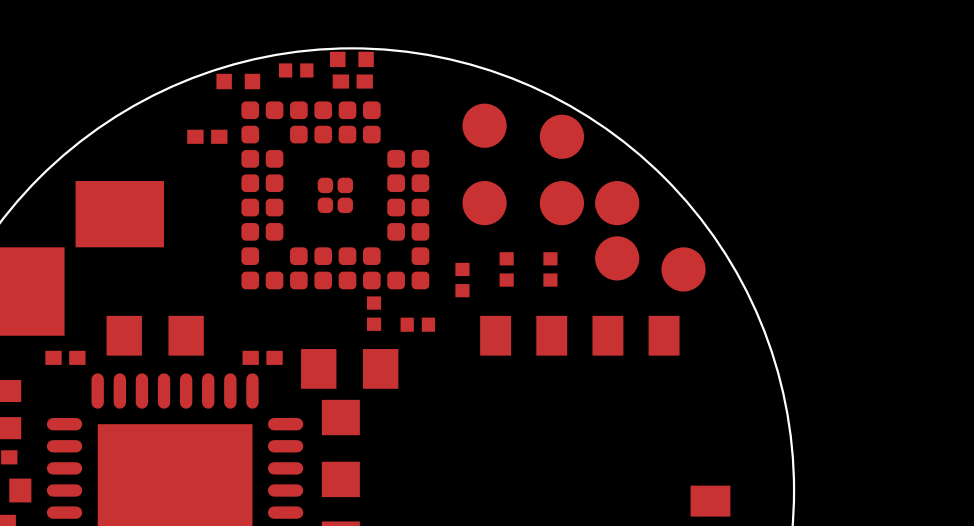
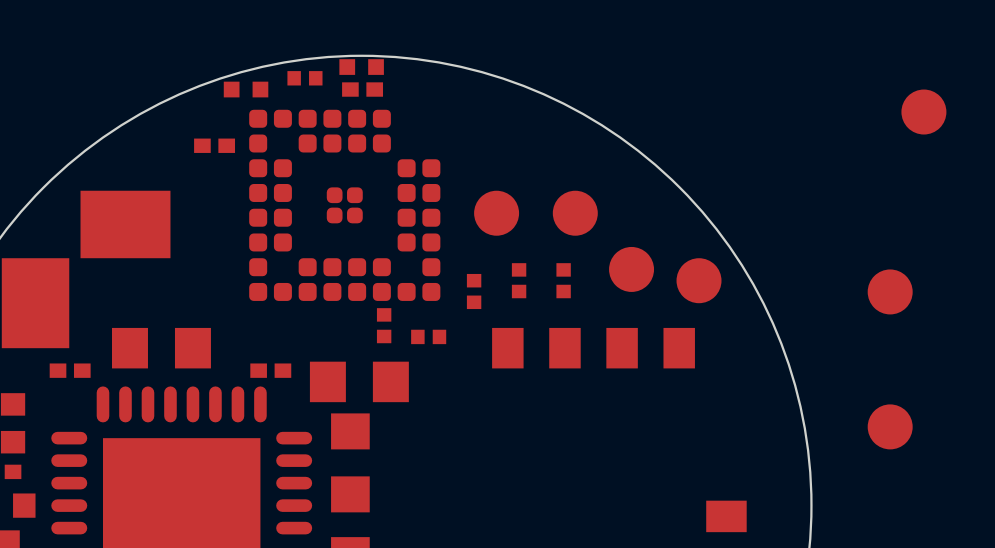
part: none -> (923, 112)
part: (484, 125) -> none
part: (561, 136) -> none
part: (617, 203) -> none
part: none -> (890, 291)
part: none -> (890, 426)

